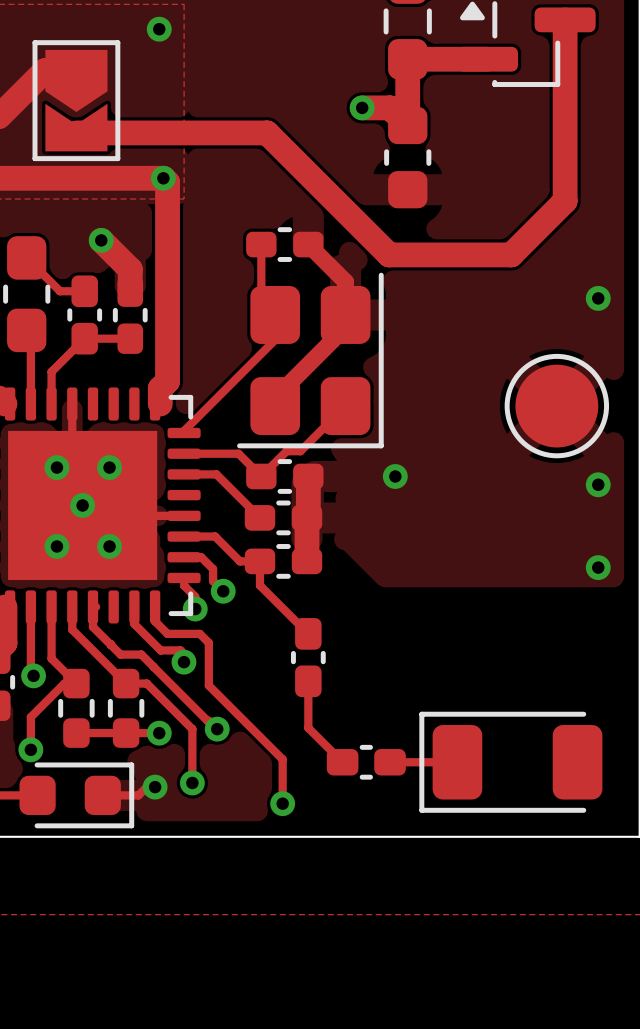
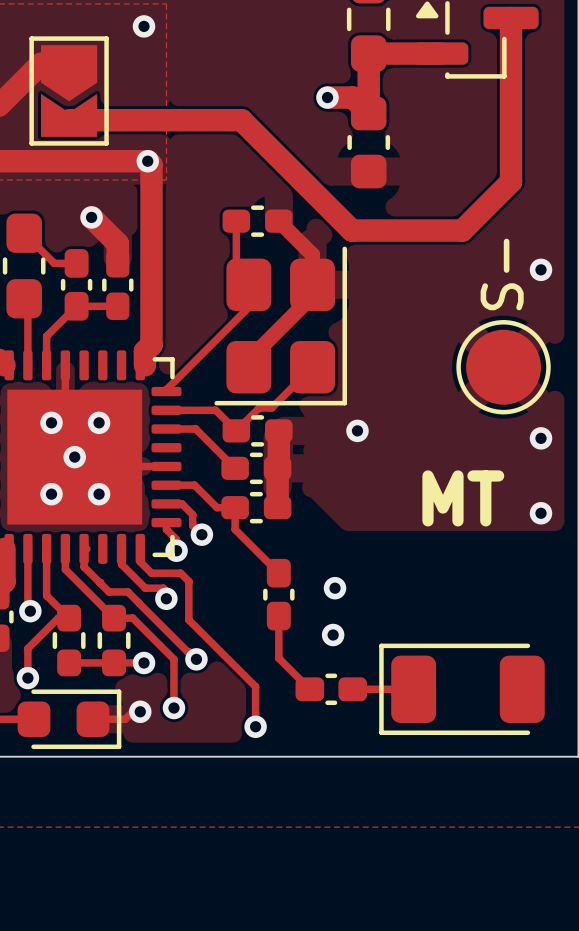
part value: none -> S- (502, 274)
text: none -> MT (463, 498)
via: none -> (335, 588)
via: none -> (333, 635)

